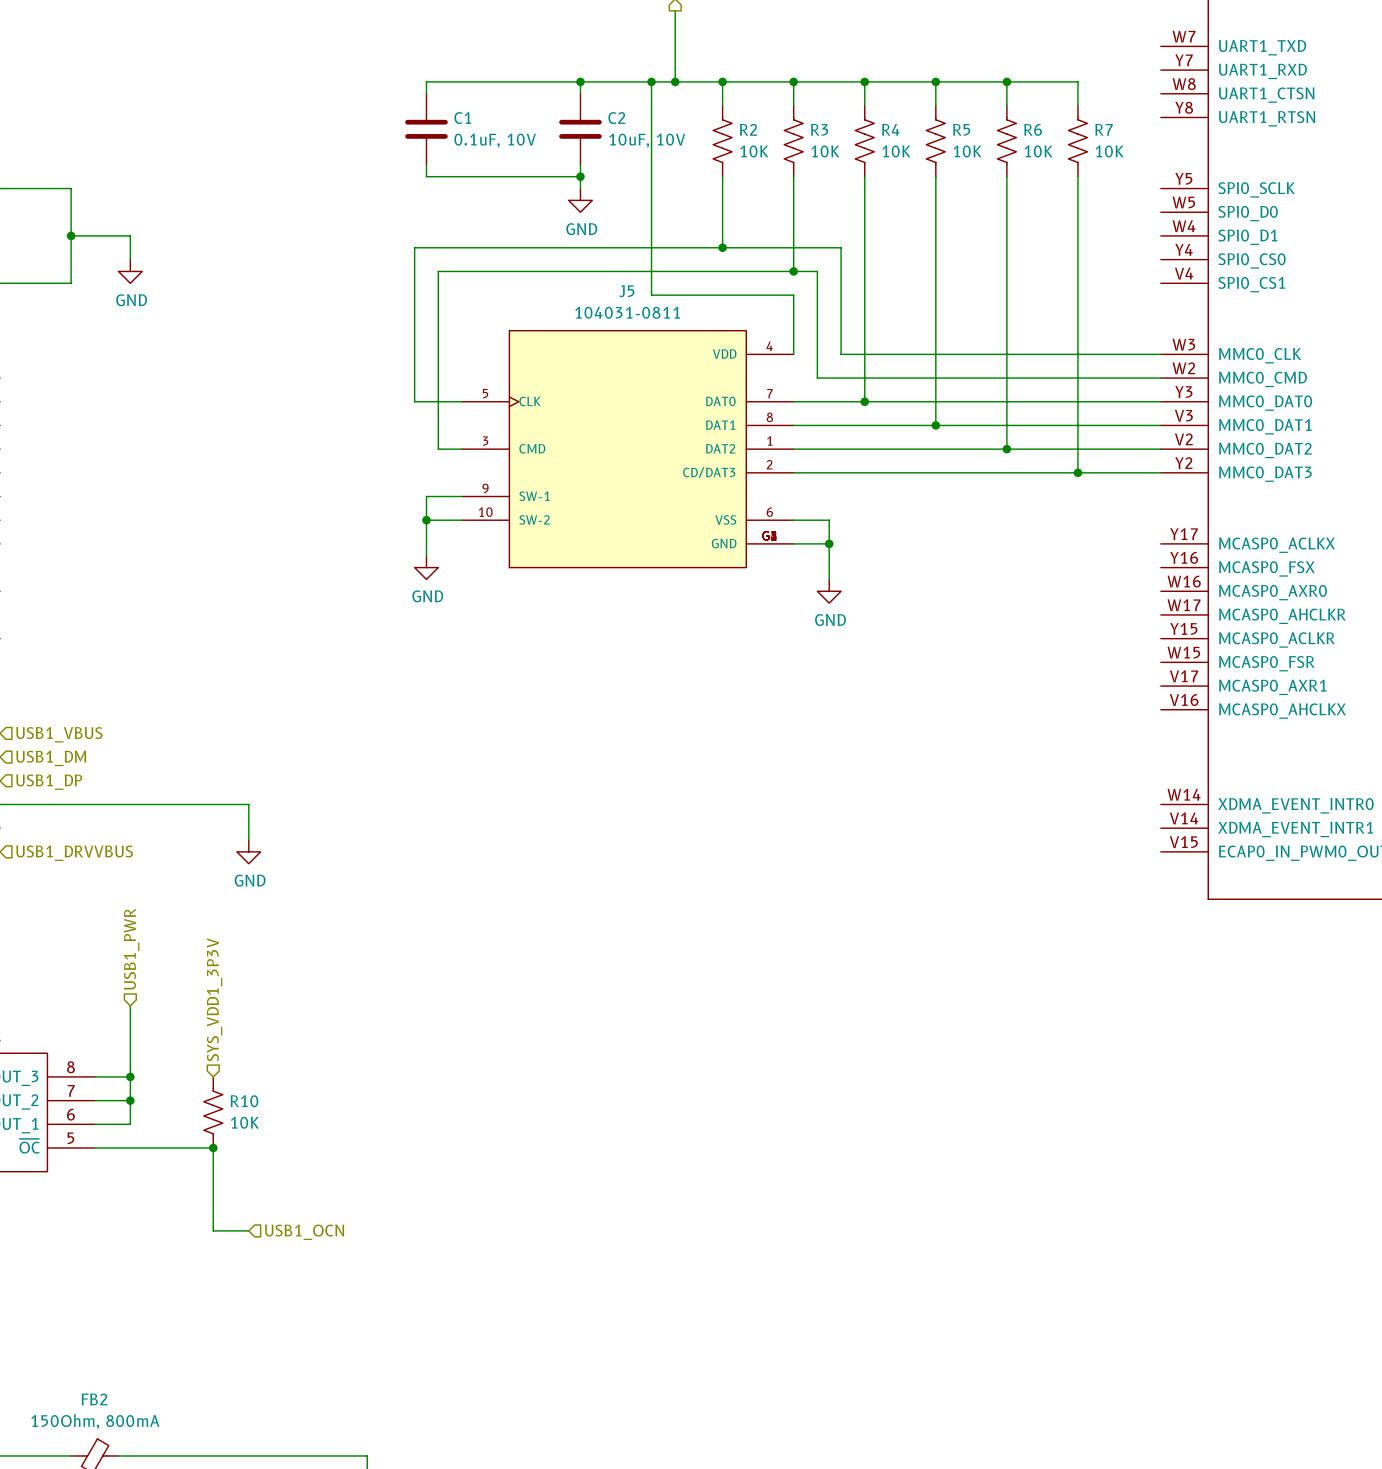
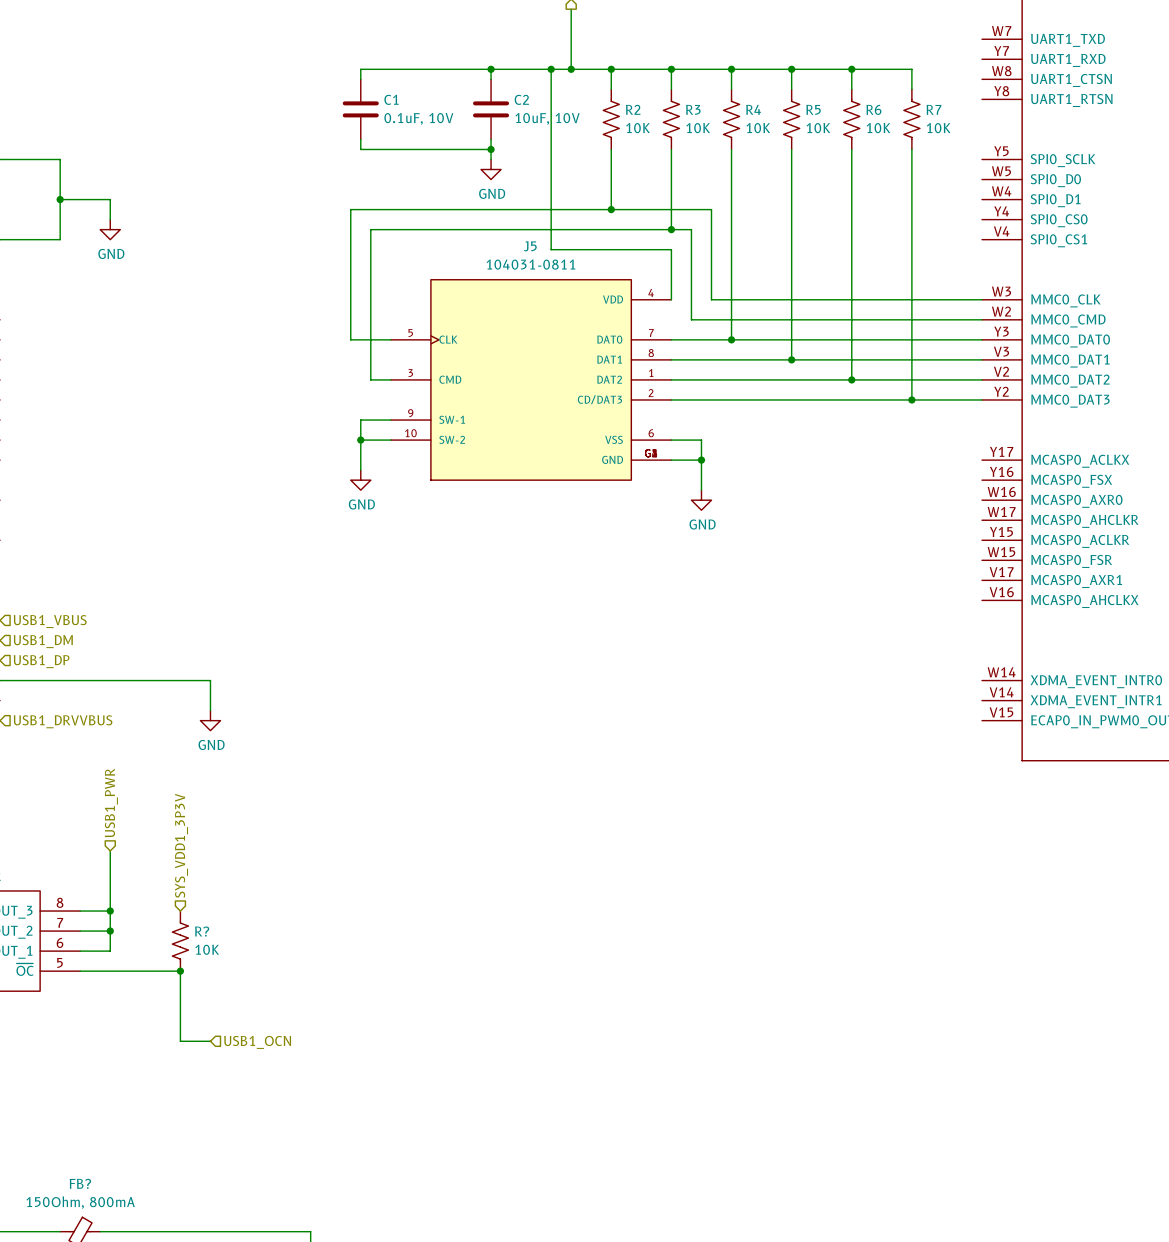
R10 name: R10 (244, 1101) -> R? (202, 931)
FB2 name: FB2 (94, 1399) -> FB? (80, 1183)

